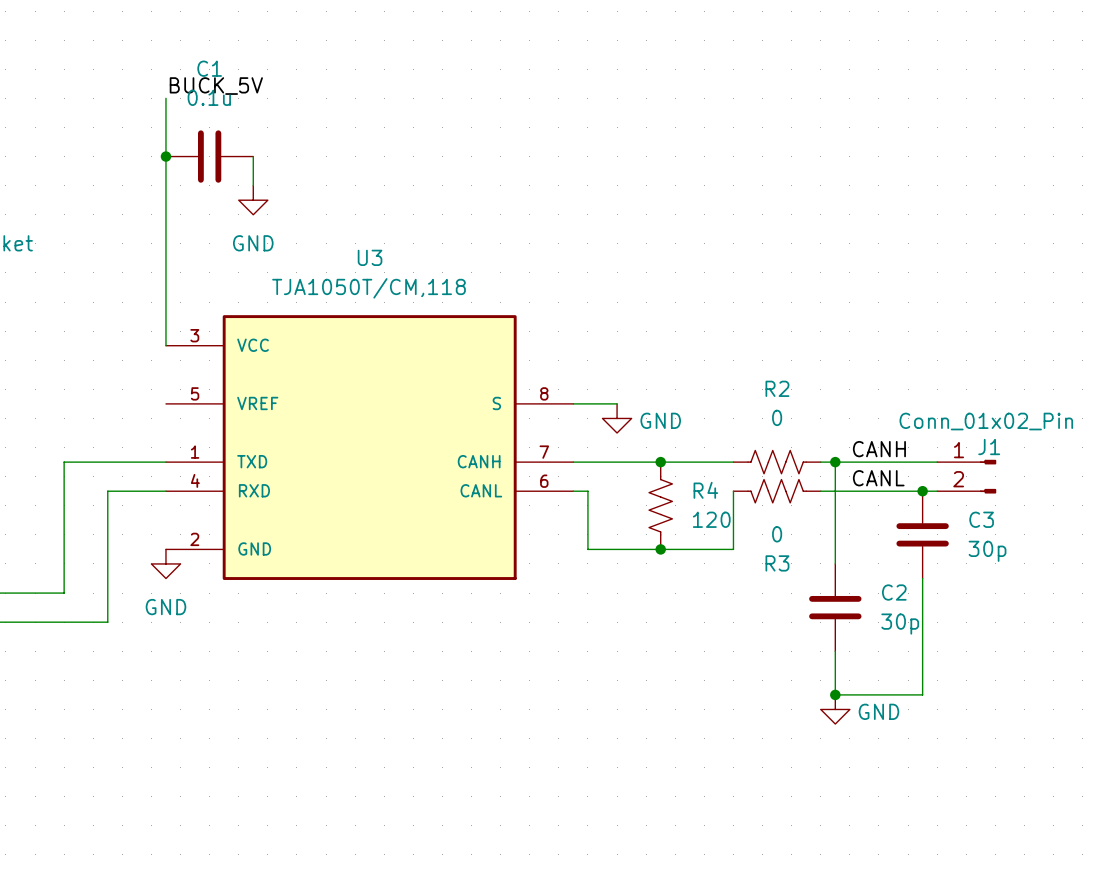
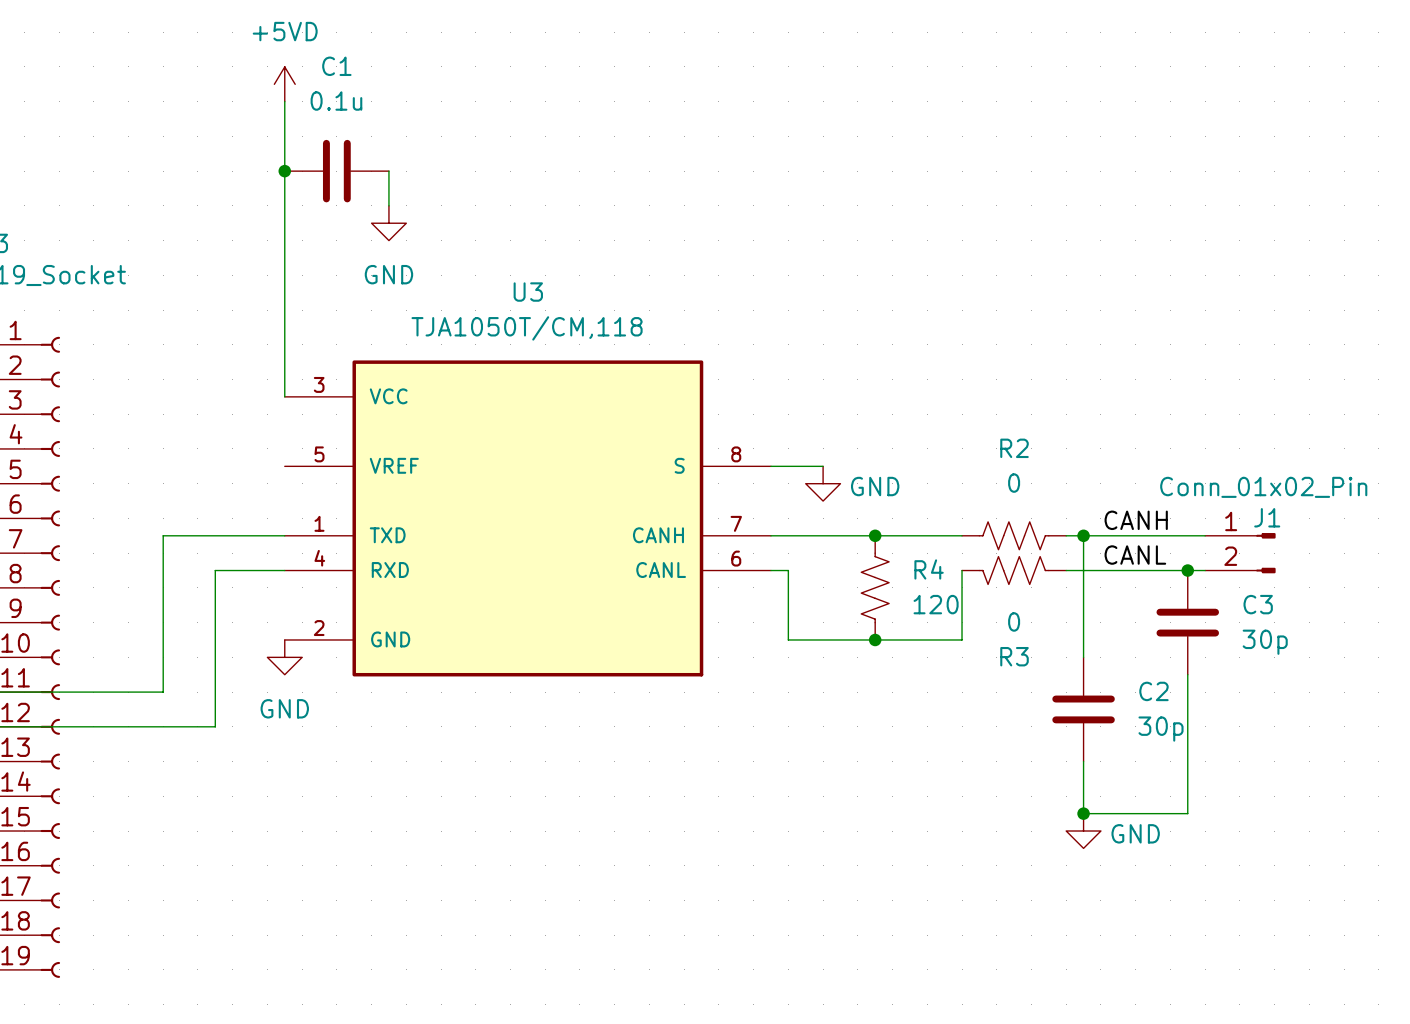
power symbol: none -> +5VD (284, 84)
label: BUCK_5V (216, 86) -> none

